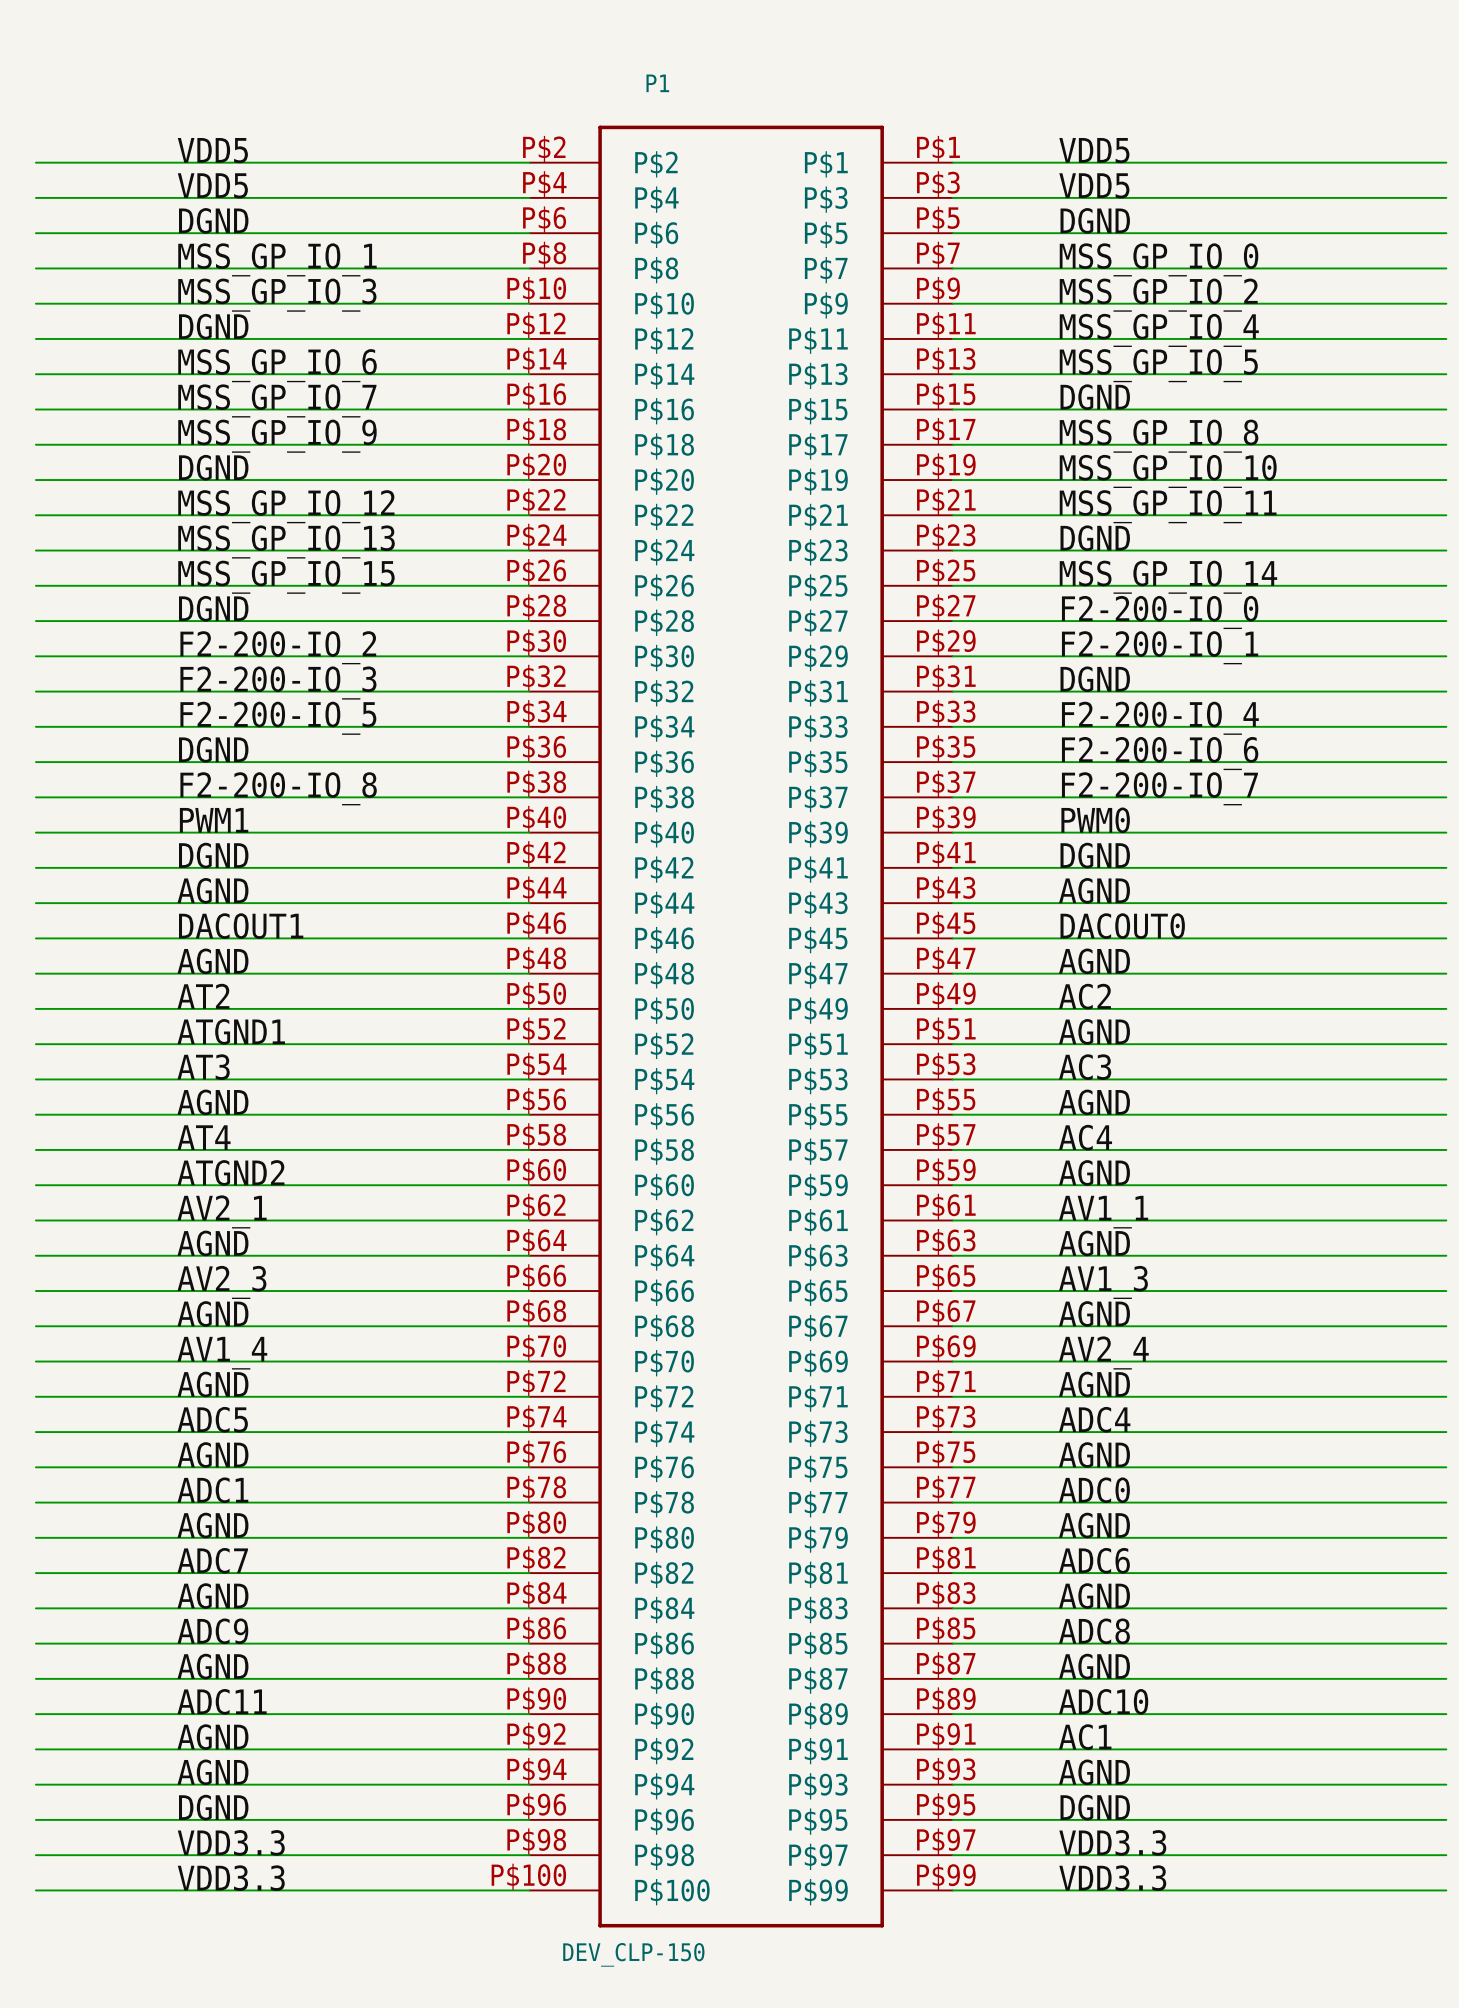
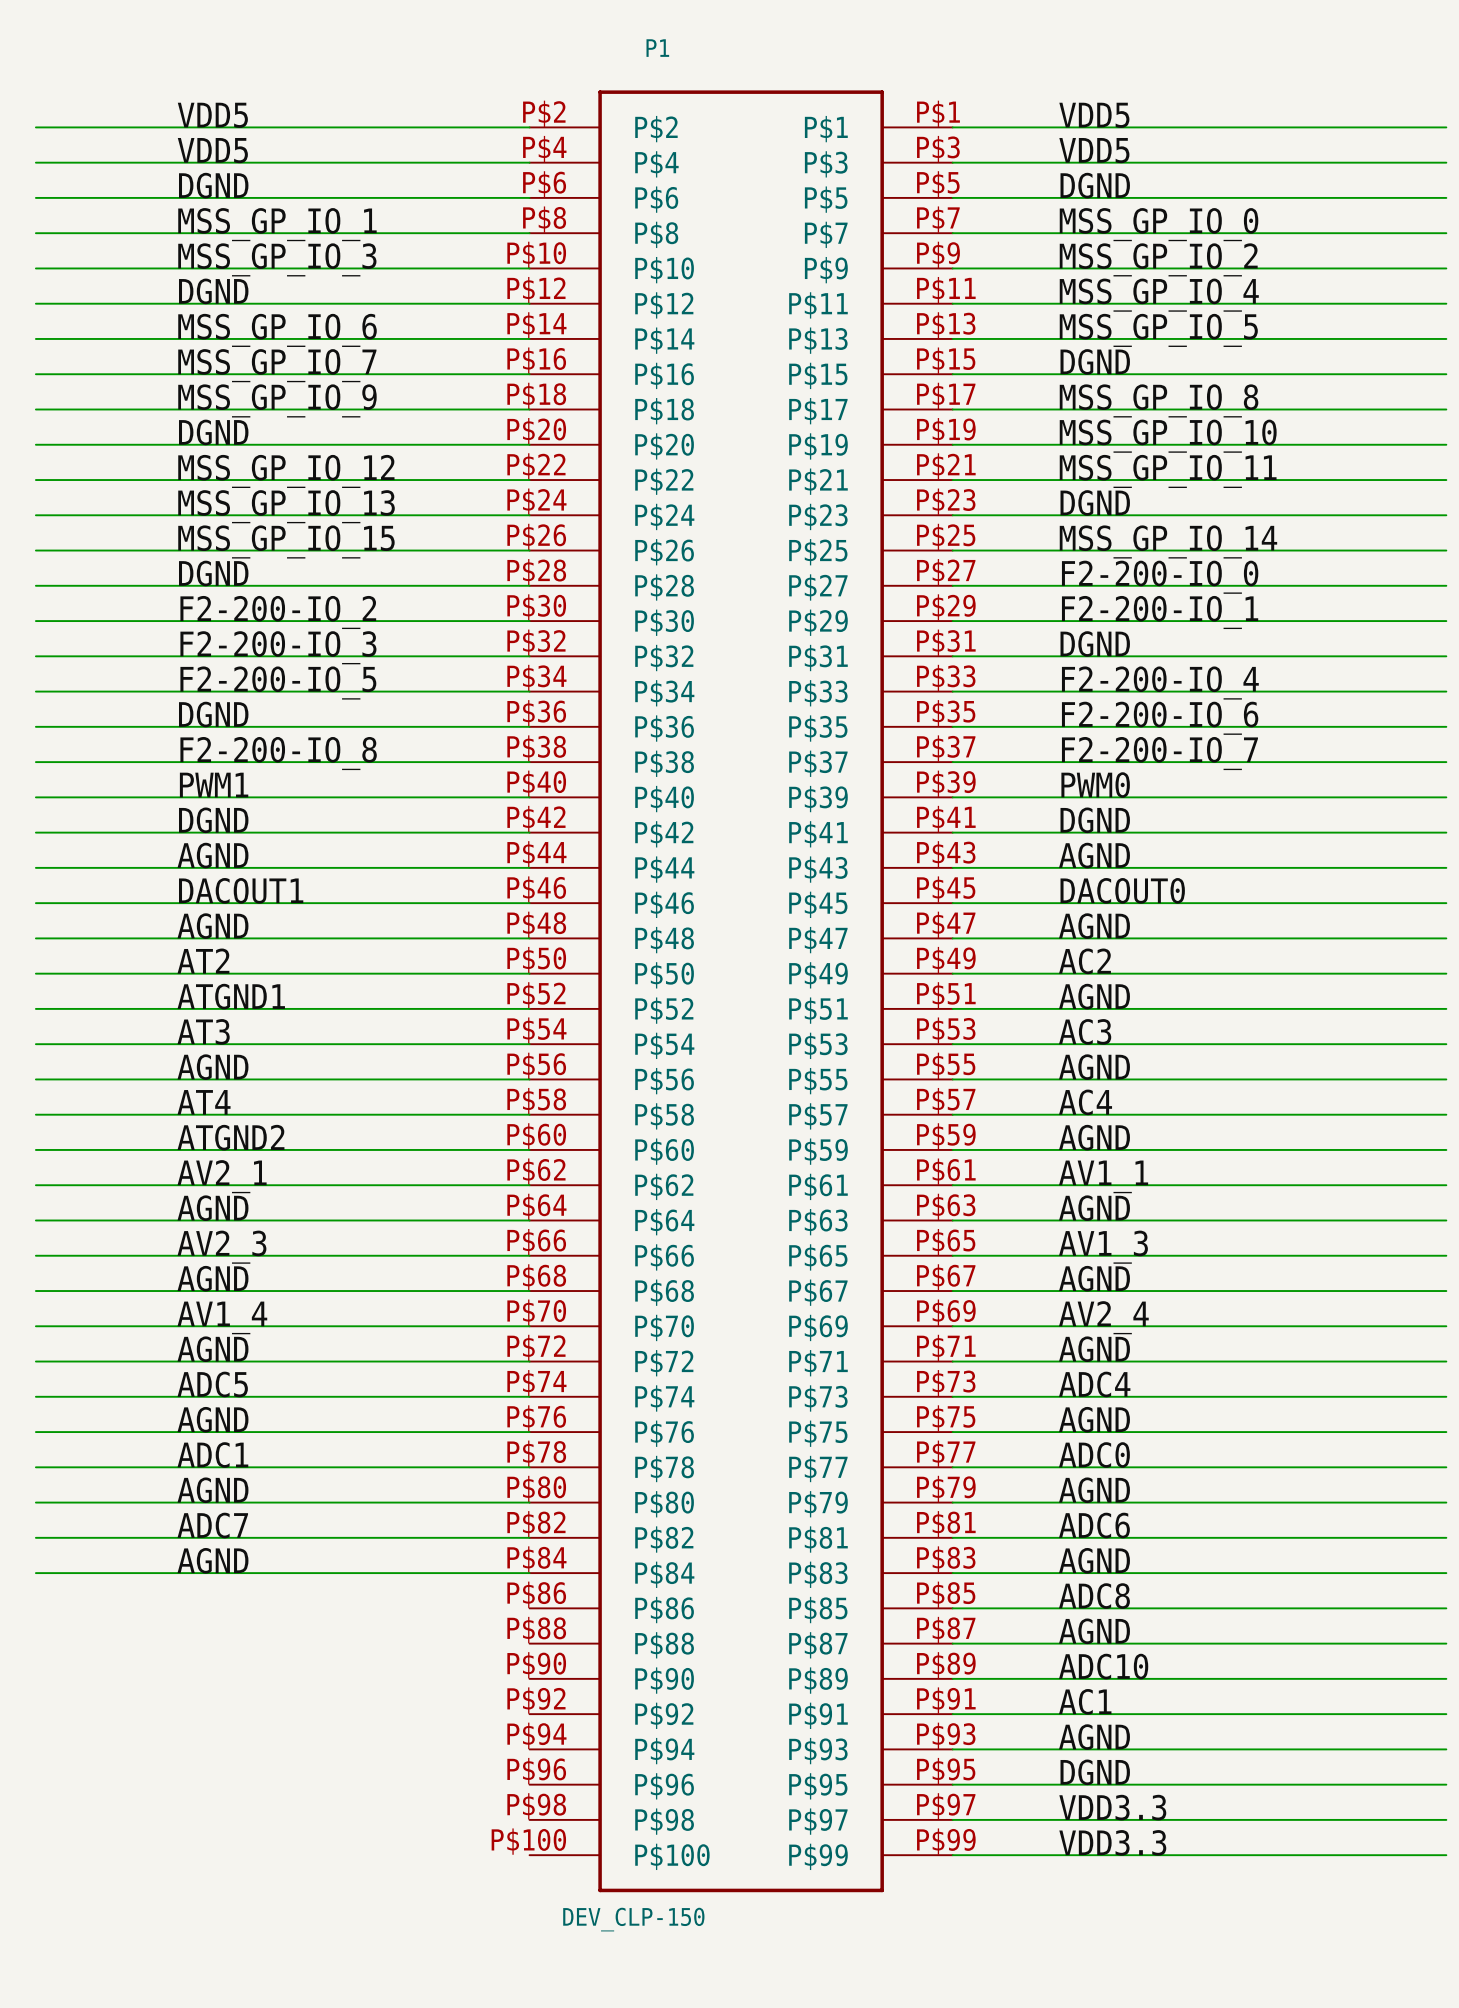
label: none -> VDD5 (212, 115)
label: none -> VDD5 (1094, 115)
wire: none -> (35, 127) (529, 127)
wire: none -> (952, 127) (1446, 127)
label: VDD5 (212, 185) -> DGND (213, 185)
label: VDD5 (1094, 185) -> DGND (1095, 185)
label: DGND (213, 220) -> MSS_GP_IO_1 (277, 224)
label: DGND (1095, 220) -> MSS_GP_IO_0 (1159, 224)
label: MSS_GP_IO_1 (277, 259) -> MSS_GP_IO_3 (277, 259)
label: MSS_GP_IO_0 (1159, 259) -> MSS_GP_IO_2 (1158, 259)
label: MSS_GP_IO_3 (277, 295) -> DGND (213, 291)
label: MSS_GP_IO_2 (1158, 295) -> MSS_GP_IO_4 (1159, 295)
label: DGND (213, 326) -> MSS_GP_IO_6 (277, 330)
label: MSS_GP_IO_4 (1159, 330) -> MSS_GP_IO_5 (1158, 330)
label: MSS_GP_IO_6 (277, 365) -> MSS_GP_IO_7 (277, 365)
label: MSS_GP_IO_5 (1158, 365) -> DGND (1095, 361)
label: DGND (1095, 397) -> MSS_GP_IO_8 (1159, 400)
label: MSS_GP_IO_7 (277, 400) -> MSS_GP_IO_9 (277, 400)
label: MSS_GP_IO_9 (277, 436) -> DGND (213, 432)
label: MSS_GP_IO_8 (1159, 436) -> MSS_GP_IO_10 (1168, 436)
label: DGND (213, 467) -> MSS_GP_IO_12 (286, 471)
label: MSS_GP_IO_10 (1168, 471) -> MSS_GP_IO_11 (1168, 471)
label: MSS_GP_IO_12 (286, 506) -> MSS_GP_IO_13 (286, 506)
label: MSS_GP_IO_11 (1168, 506) -> DGND (1095, 502)
label: DGND (1095, 538) -> MSS_GP_IO_14 (1168, 541)
label: MSS_GP_IO_13 (286, 541) -> MSS_GP_IO_15 (286, 541)
label: MSS_GP_IO_15 (286, 577) -> DGND (213, 573)
label: MSS_GP_IO_14 (1168, 577) -> F2-200-IO_0 (1160, 577)
label: DGND (213, 608) -> F2-200-IO_2 (278, 612)
label: F2-200-IO_0 (1160, 612) -> F2-200-IO_1 (1160, 612)
label: F2-200-IO_2 (278, 647) -> F2-200-IO_3 (278, 647)
label: F2-200-IO_1 (1160, 647) -> DGND (1095, 644)
label: DGND (1095, 679) -> F2-200-IO_4 (1160, 683)
label: F2-200-IO_3 (278, 683) -> F2-200-IO_5 (278, 683)
label: F2-200-IO_5 (278, 718) -> DGND (213, 714)
label: F2-200-IO_4 (1160, 718) -> F2-200-IO_6 (1160, 718)
label: DGND (213, 749) -> F2-200-IO_8 (278, 753)
label: F2-200-IO_6 (1160, 753) -> F2-200-IO_7 (1159, 753)
label: F2-200-IO_8 (278, 788) -> PWM1 (214, 785)
label: F2-200-IO_7 (1159, 788) -> PWM0 (1095, 785)
label: PWM1 (214, 820) -> DGND (213, 820)
label: PWM0 (1095, 820) -> DGND (1095, 820)
label: DGND (213, 855) -> AGND (212, 855)
label: DGND (1095, 855) -> AGND (1094, 855)
label: AGND (212, 890) -> DACOUT1 (241, 890)
label: AGND (1094, 890) -> DACOUT0 (1122, 890)
label: DACOUT1 (241, 926) -> AGND (212, 926)
label: DACOUT0 (1122, 926) -> AGND (1094, 926)
label: AGND (212, 961) -> AT2 (203, 961)
label: AGND (1094, 961) -> AC2 (1084, 961)
label: AT2 (203, 996) -> ATGND1 (231, 996)
label: AC2 (1084, 996) -> AGND (1094, 996)
P1 position: (741, 1026) -> (741, 991)
label: ATGND1 (231, 1031) -> AT3 (203, 1031)
label: AGND (1094, 1031) -> AC3 (1085, 1031)
label: AT3 (203, 1067) -> AGND (212, 1067)
label: AC3 (1085, 1067) -> AGND (1094, 1067)
label: AGND (212, 1102) -> AT4 (204, 1102)
label: AGND (1094, 1102) -> AC4 (1085, 1102)
label: AT4 (204, 1137) -> ATGND2 (230, 1137)
label: AC4 (1085, 1137) -> AGND (1094, 1137)
label: ATGND2 (230, 1172) -> AV2_1 (222, 1176)
label: AGND (1094, 1172) -> AV1_1 (1103, 1176)
label: AV2_1 (222, 1211) -> AGND (212, 1208)
label: AV1_1 (1103, 1212) -> AGND (1094, 1208)
label: AGND (212, 1243) -> AV2_3 (221, 1247)
label: AGND (1094, 1243) -> AV1_3 (1103, 1247)
label: AV2_3 (221, 1282) -> AGND (212, 1278)
label: AV1_3 (1103, 1282) -> AGND (1094, 1278)
label: AGND (212, 1313) -> AV1_4 (222, 1317)
label: AGND (1094, 1313) -> AV2_4 (1103, 1317)
label: AV2_4 (1103, 1352) -> AGND (1094, 1349)
label: AV1_4 (222, 1353) -> AGND (212, 1349)
label: AGND (212, 1384) -> ADC5 (212, 1384)
label: AGND (1094, 1384) -> ADC4 (1094, 1384)
label: ADC5 (212, 1419) -> AGND (212, 1419)
label: ADC4 (1094, 1419) -> AGND (1094, 1419)
label: AGND (212, 1454) -> ADC1 (212, 1454)
label: AGND (1094, 1454) -> ADC0 (1094, 1454)
label: ADC1 (212, 1490) -> AGND (212, 1490)
label: ADC0 (1094, 1490) -> AGND (1094, 1490)
label: AGND (212, 1525) -> ADC7 (212, 1525)
label: AGND (1094, 1525) -> ADC6 (1094, 1525)
label: ADC7 (212, 1560) -> AGND (212, 1560)
label: ADC6 (1094, 1560) -> AGND (1094, 1560)
label: AGND (212, 1596) -> none
label: AGND (1094, 1596) -> ADC8 (1094, 1596)
wire: (35, 1608) (529, 1608) -> none
label: ADC9 (212, 1631) -> none
label: ADC8 (1094, 1631) -> AGND (1094, 1631)
wire: (35, 1643) (529, 1643) -> none
label: AGND (212, 1666) -> none
label: AGND (1094, 1666) -> ADC10 (1103, 1666)
wire: (35, 1678) (529, 1678) -> none
label: ADC11 (222, 1701) -> none
label: ADC10 (1103, 1701) -> AC1 (1085, 1701)
wire: (35, 1714) (529, 1714) -> none
label: AGND (212, 1737) -> none
label: AC1 (1085, 1737) -> AGND (1094, 1737)
wire: (35, 1749) (529, 1749) -> none
label: AGND (212, 1772) -> none
label: AGND (1094, 1772) -> DGND (1095, 1772)
wire: (35, 1784) (529, 1784) -> none
label: DGND (213, 1807) -> none
label: DGND (1095, 1807) -> VDD3.3 (1112, 1807)
wire: (35, 1819) (529, 1819) -> none
label: VDD3.3 (231, 1842) -> none
wire: (35, 1855) (529, 1855) -> none
label: VDD3.3 (231, 1878) -> none
label: VDD3.3 (1112, 1878) -> none
wire: (35, 1890) (529, 1890) -> none
wire: (952, 1890) (1446, 1890) -> none

